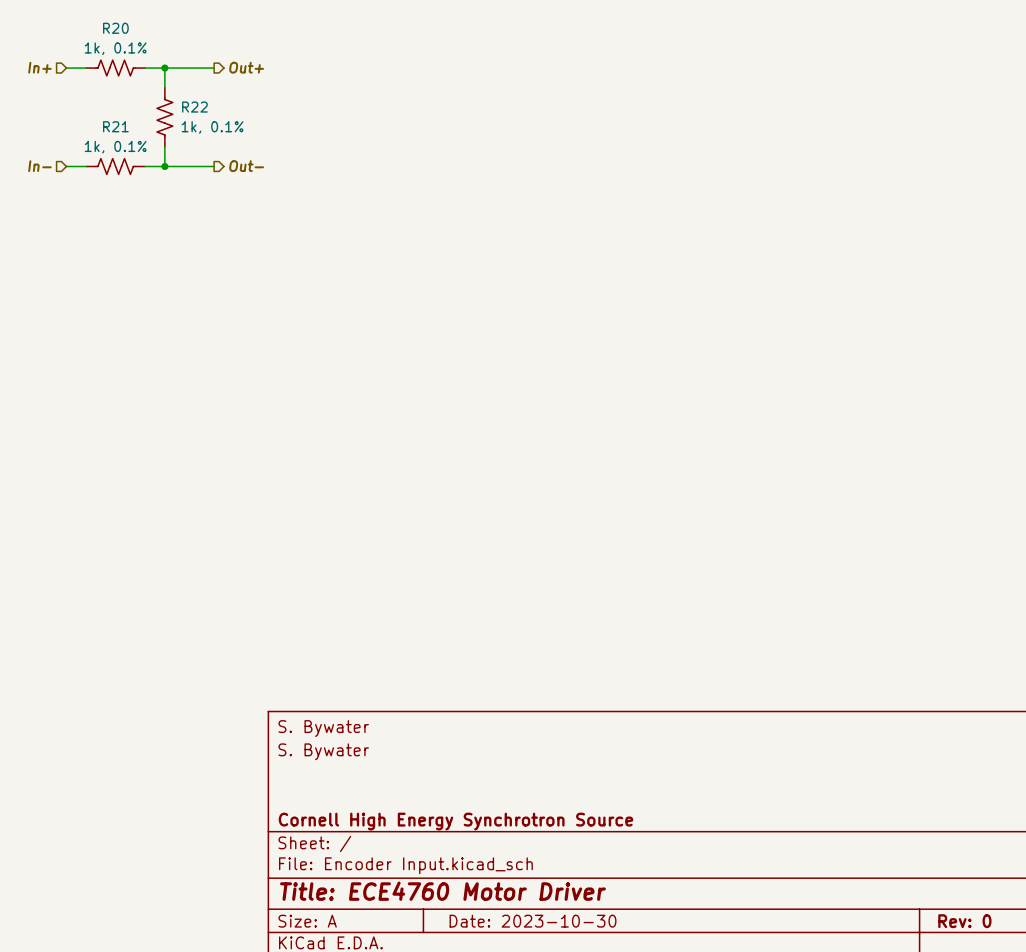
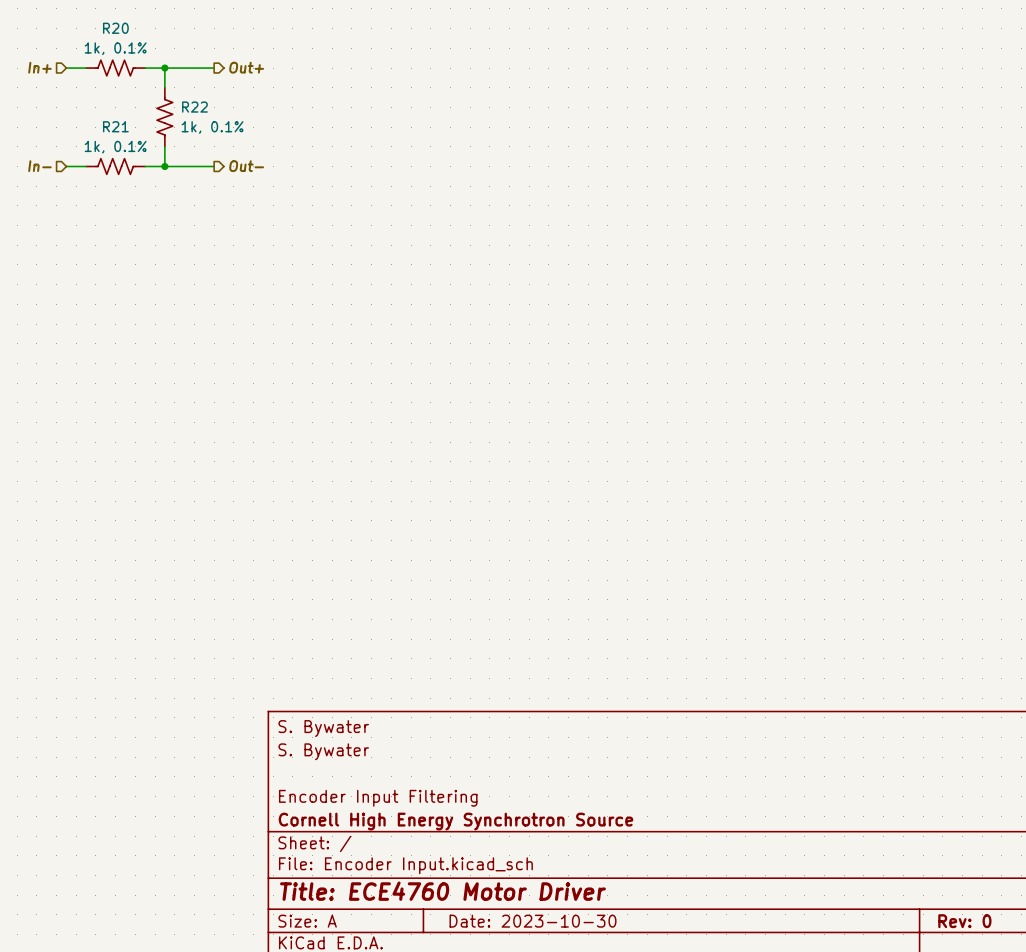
title block: none -> Encoder Input Filtering (378, 798)

